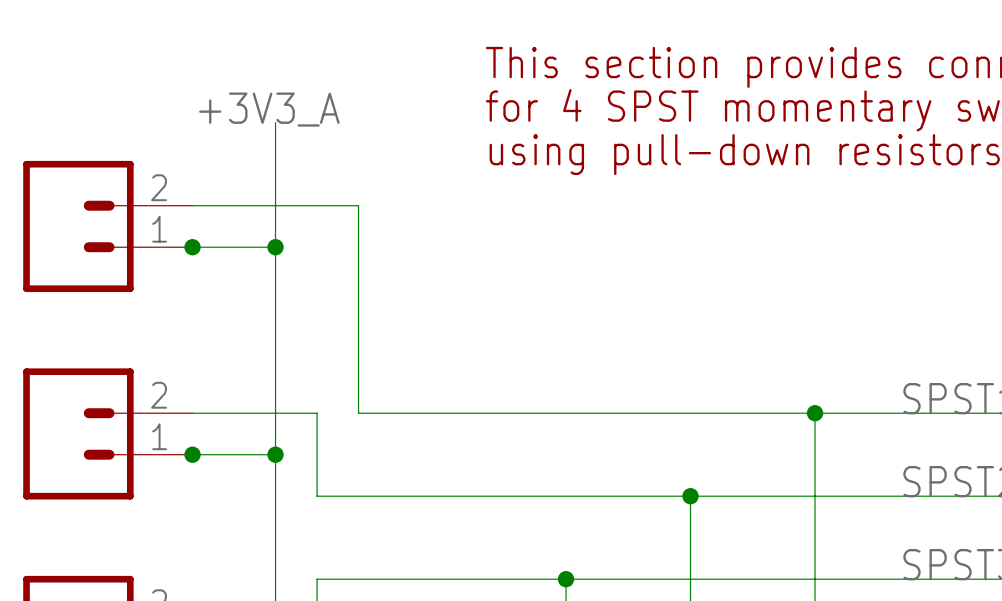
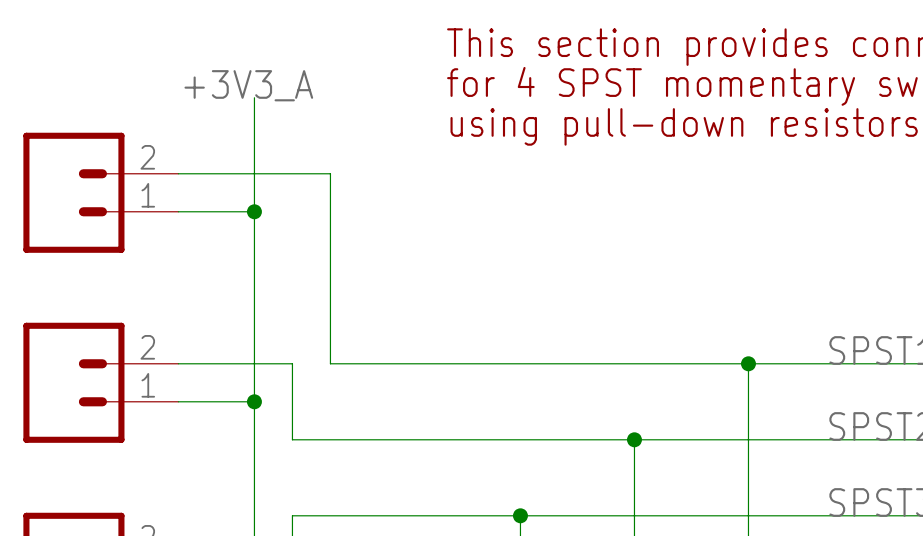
junction: (192, 247) -> none
junction: (192, 454) -> none

